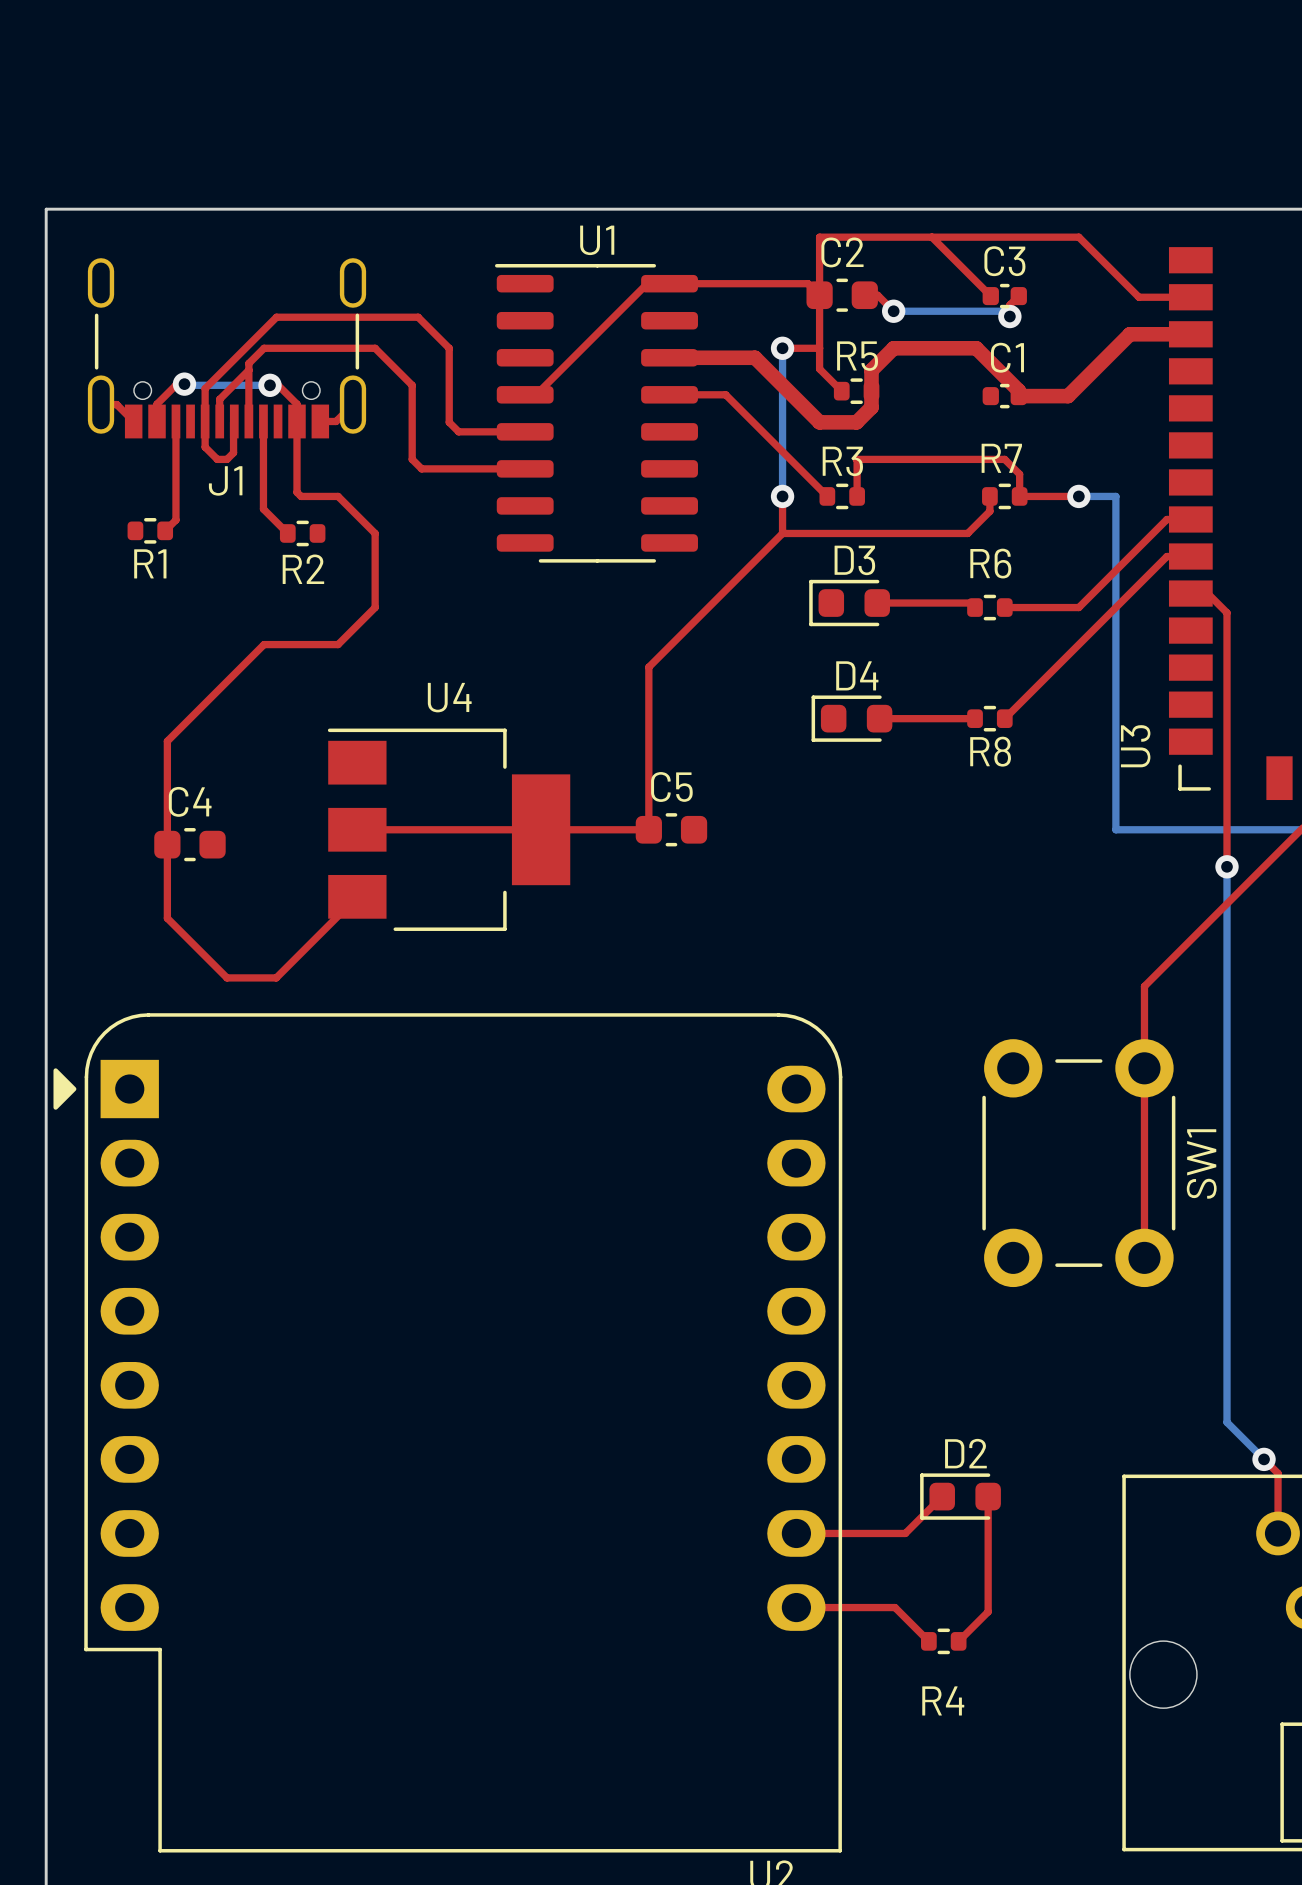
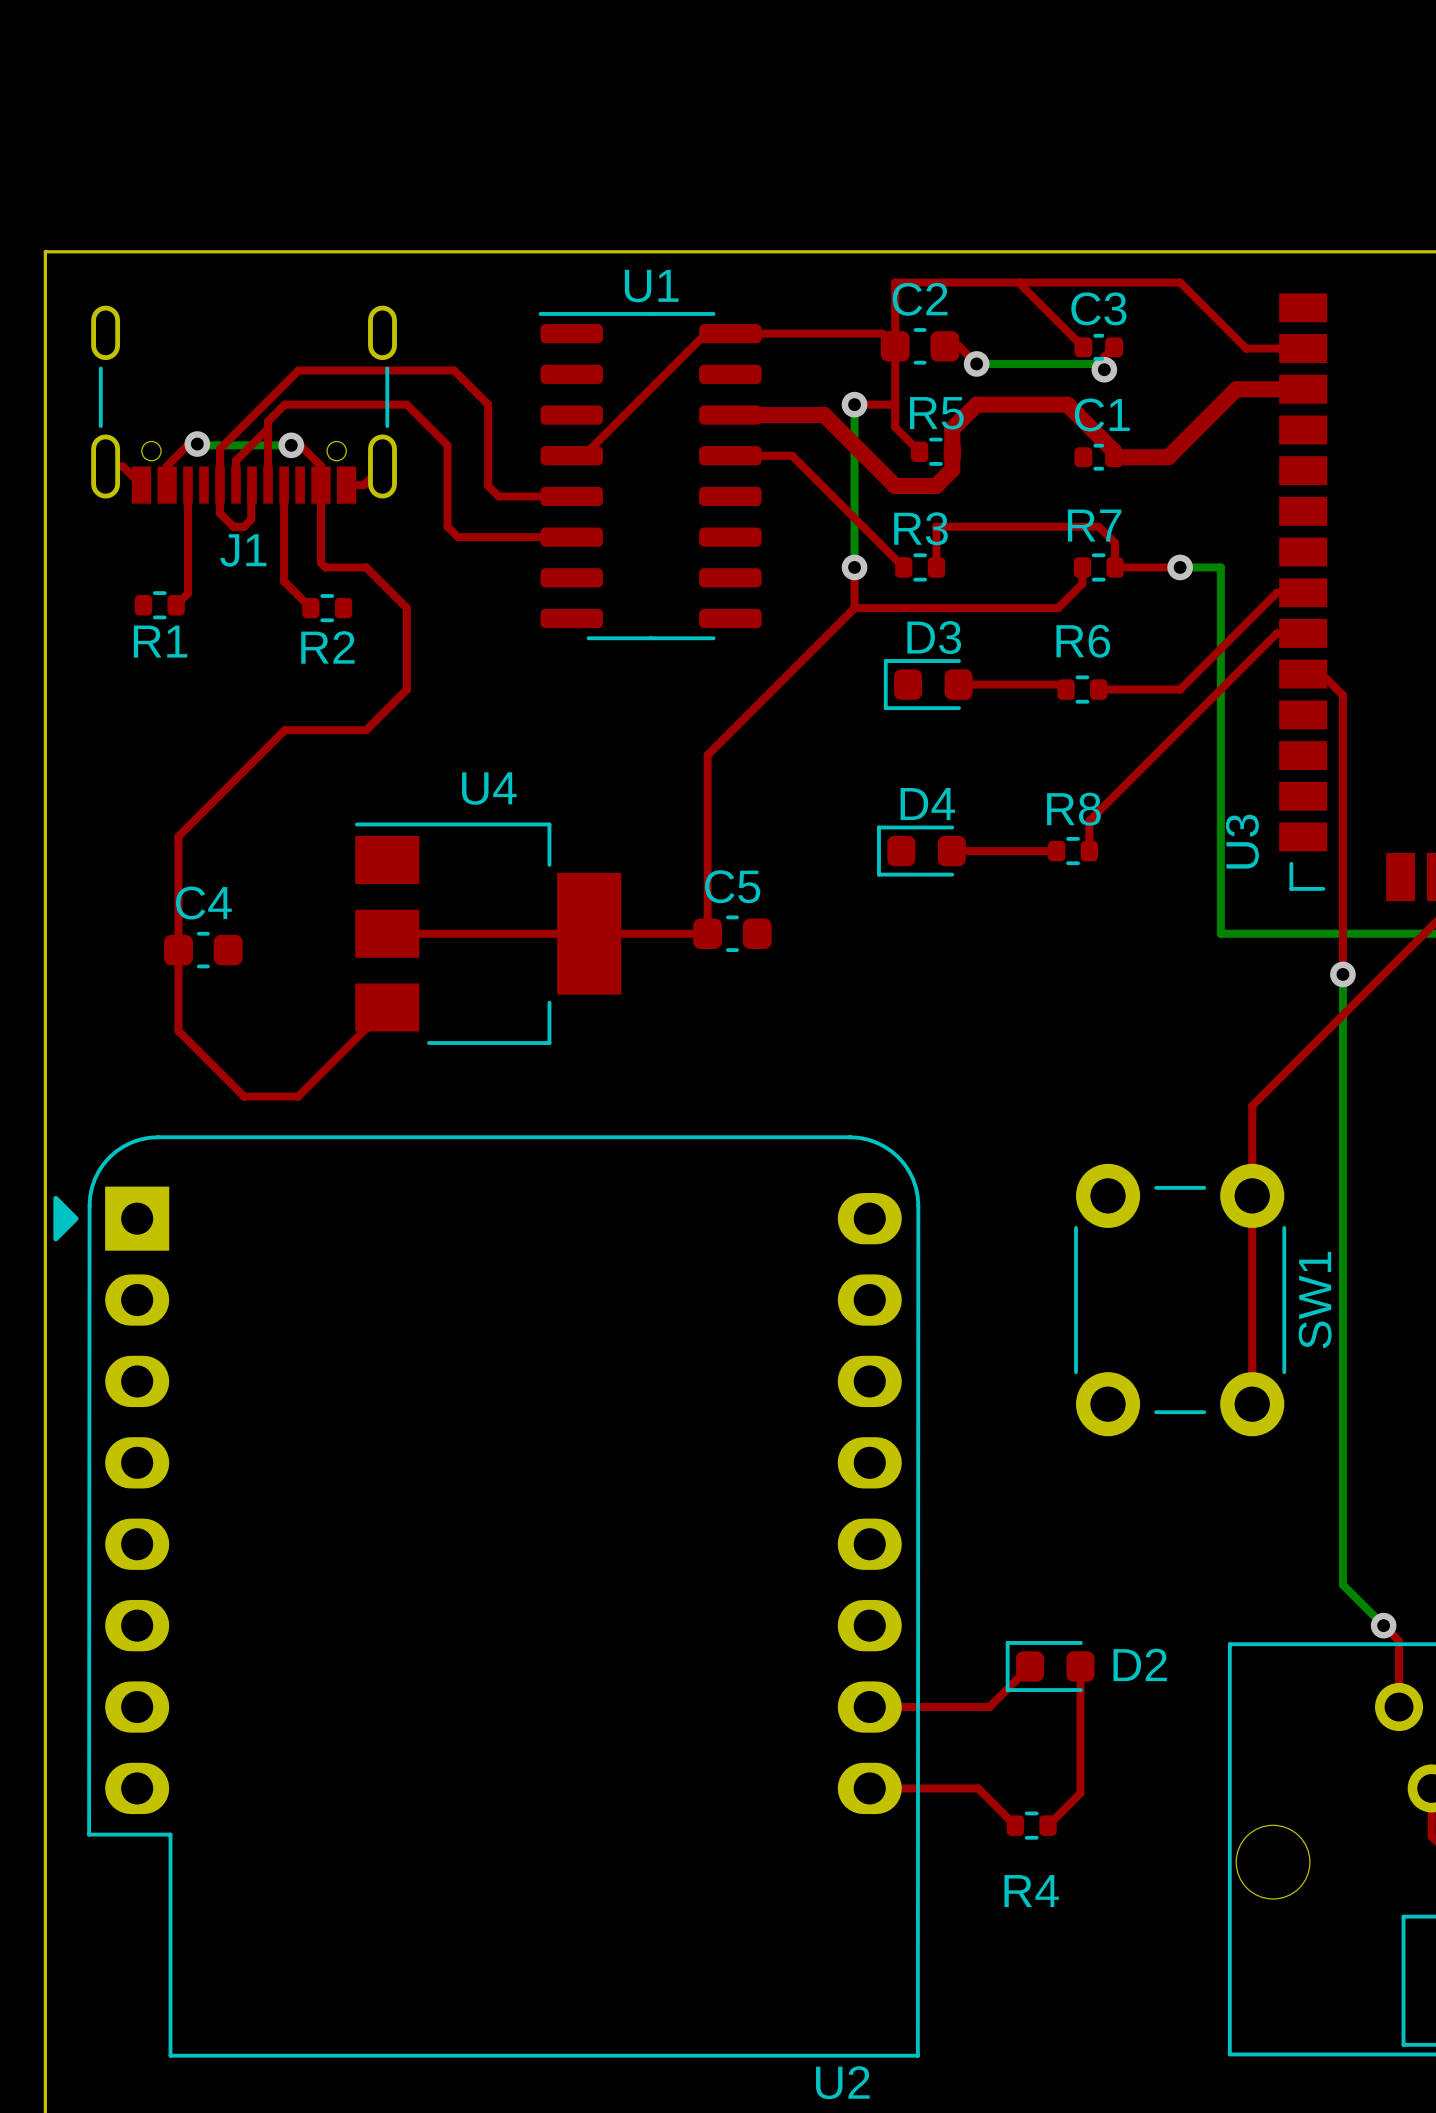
D4 position: (851, 718) -> (921, 851)
top track: (879, 718) (975, 718) -> (951, 851) (1056, 851)
R8 position: (989, 718) -> (1073, 851)
top track: none -> (1098, 811) (1089, 821) (1089, 851)
R8 name position: R8 (990, 751) -> R8 (1073, 809)
D2 name position: D2 (965, 1453) -> D2 (1140, 1664)

